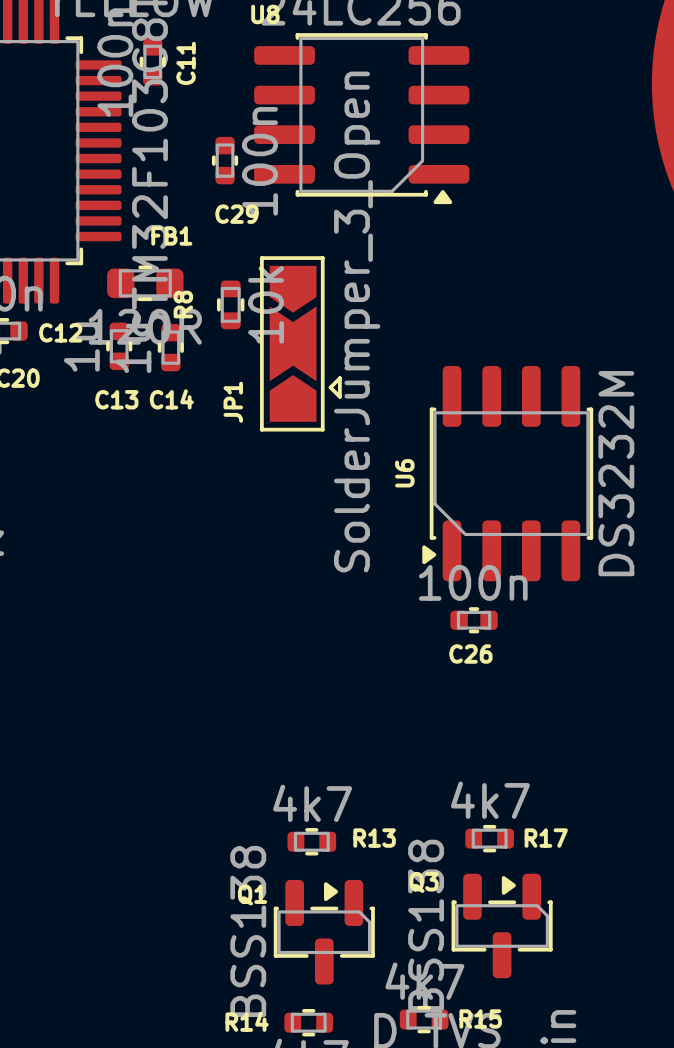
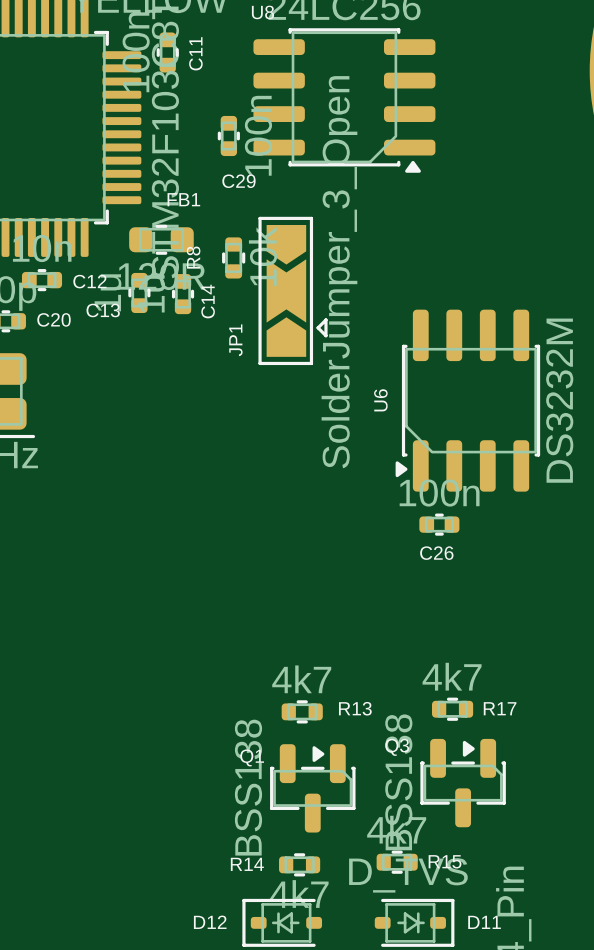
C13 name position: C13 (116, 399) -> C13 (103, 310)
C14 name rotation: 0° (171, 399) -> 90° counterclockwise (208, 301)

